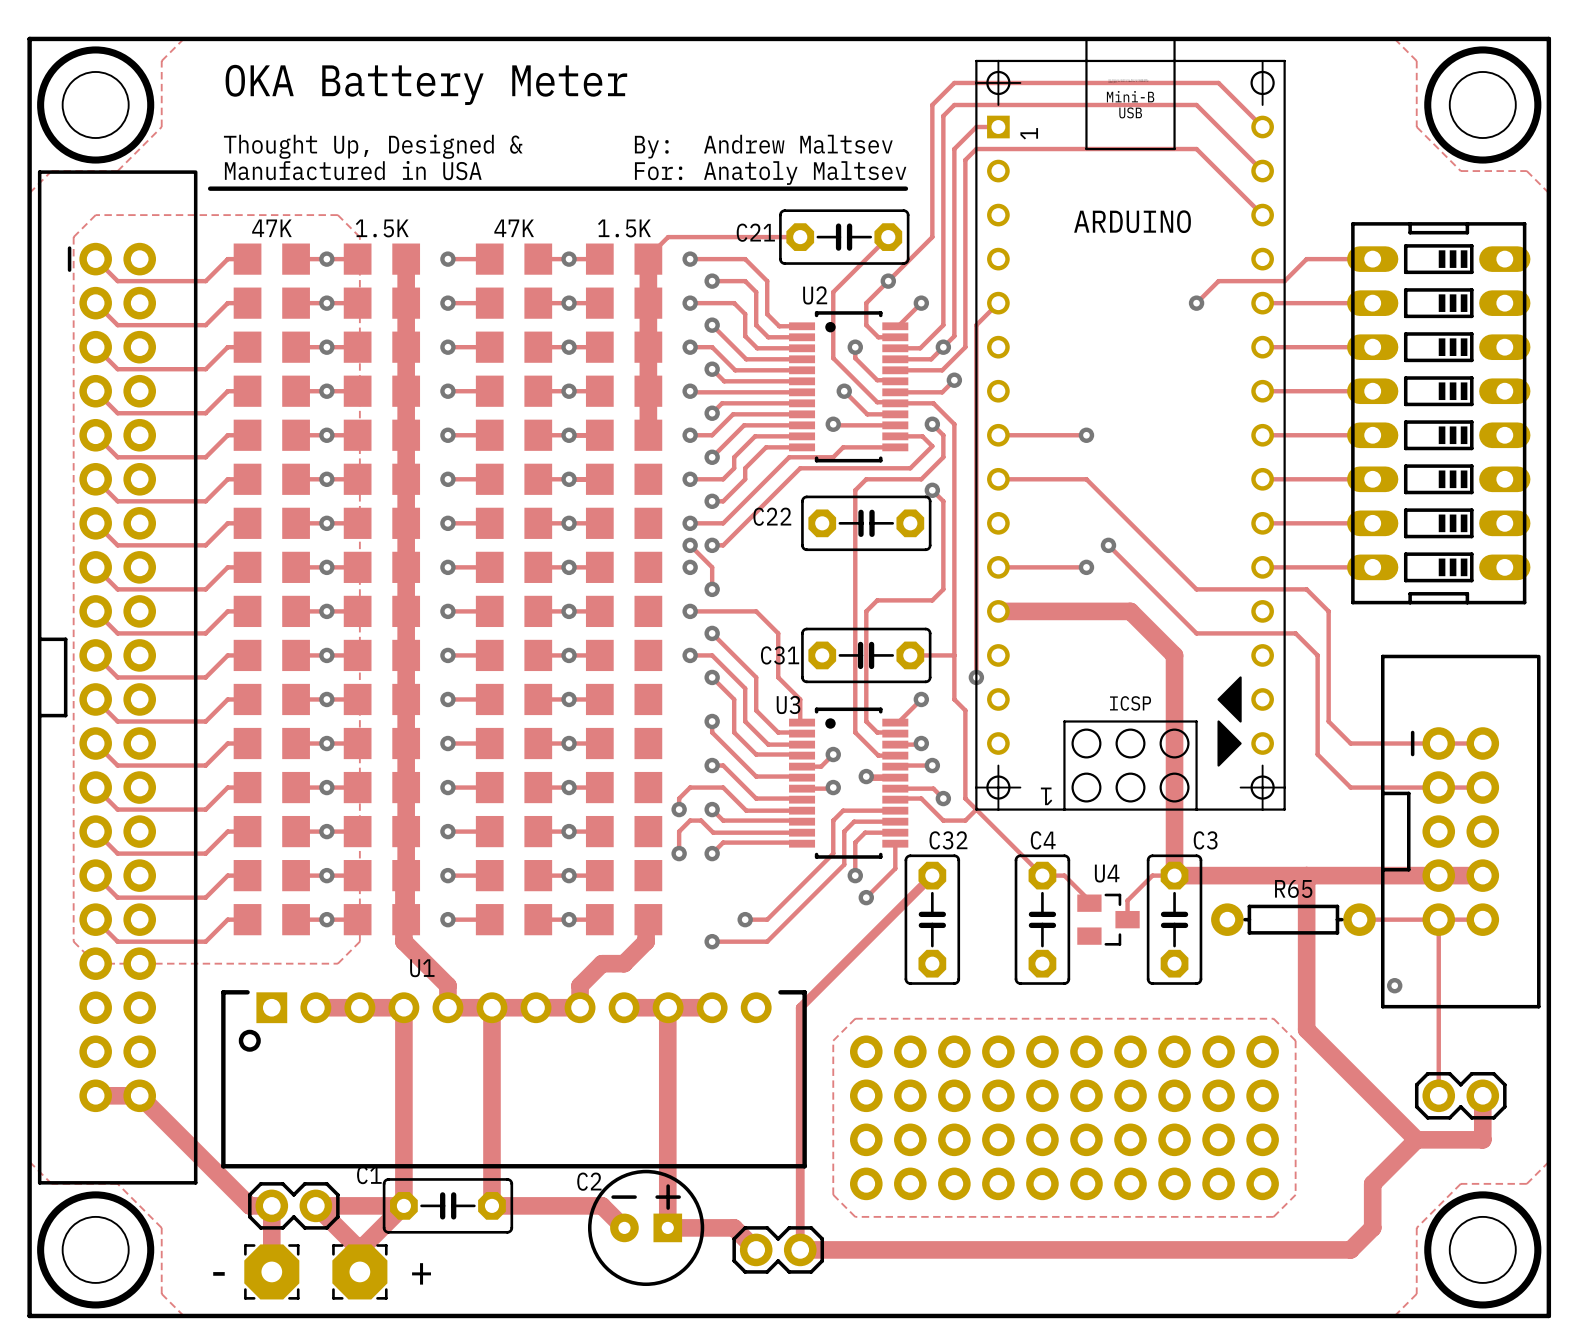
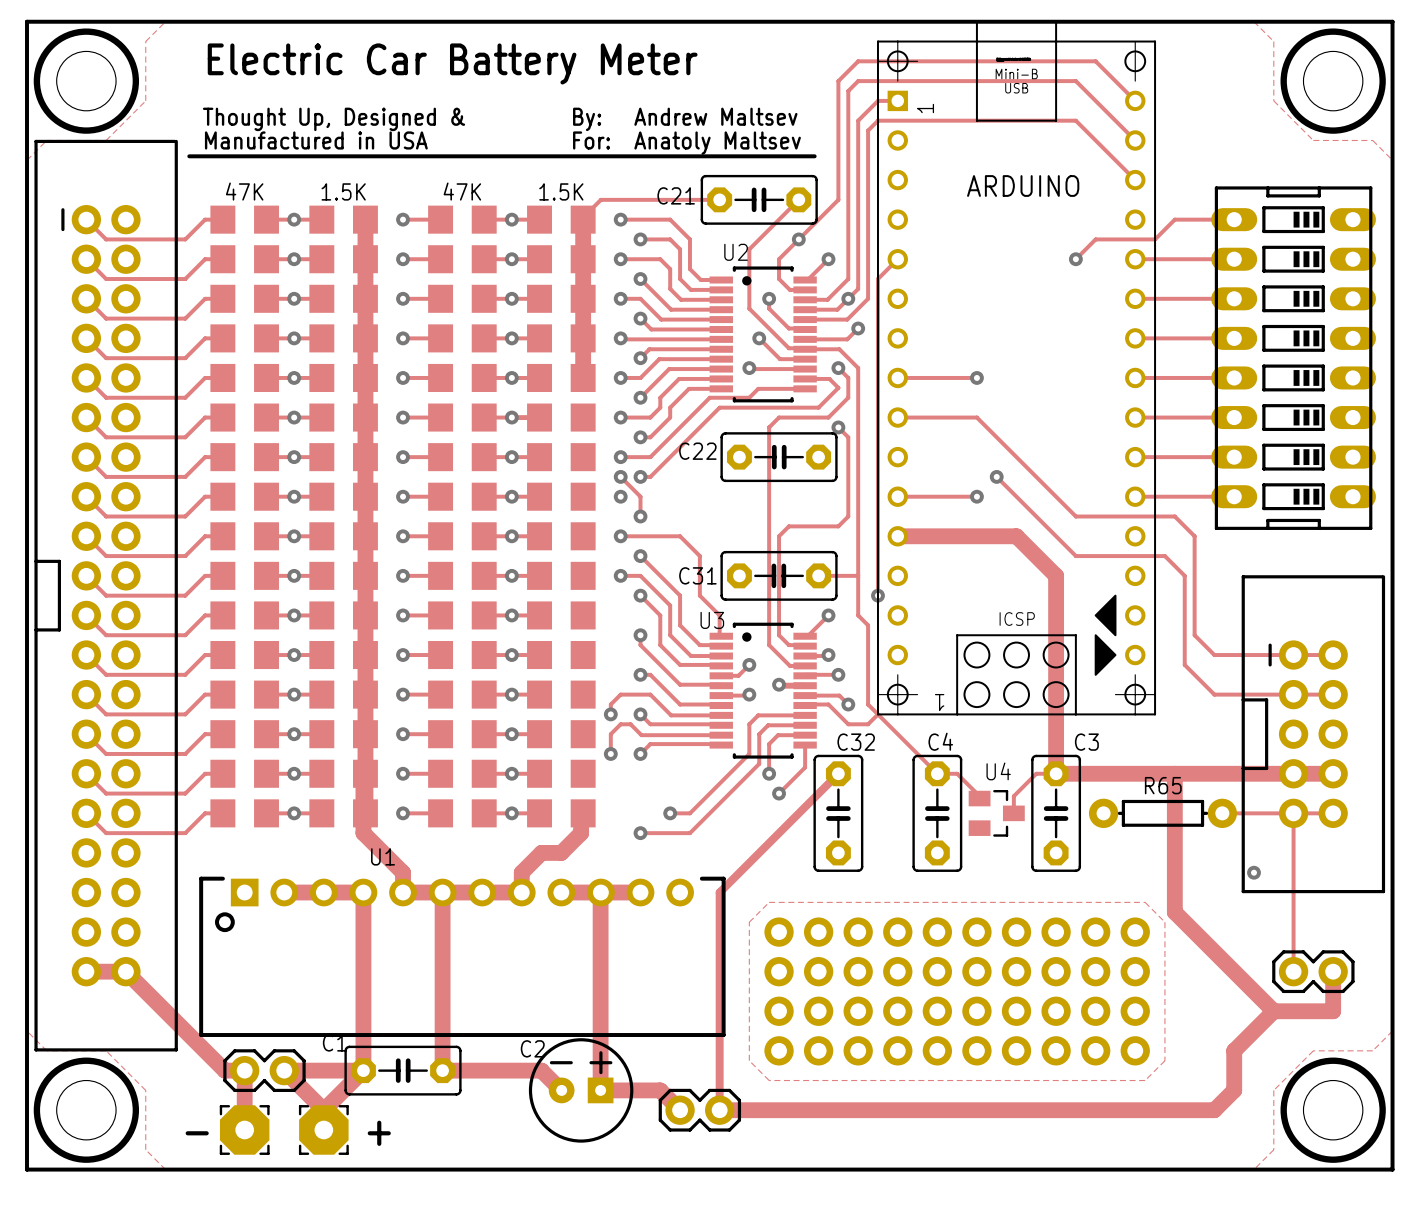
text: OKA Battery Meter (426, 84) -> Electric Car Battery Meter (452, 63)
zone outline: (95, 215) (337, 215) (359, 237) (359, 941) (337, 963) (95, 963) (73, 941) (73, 237) (95, 215) -> none

